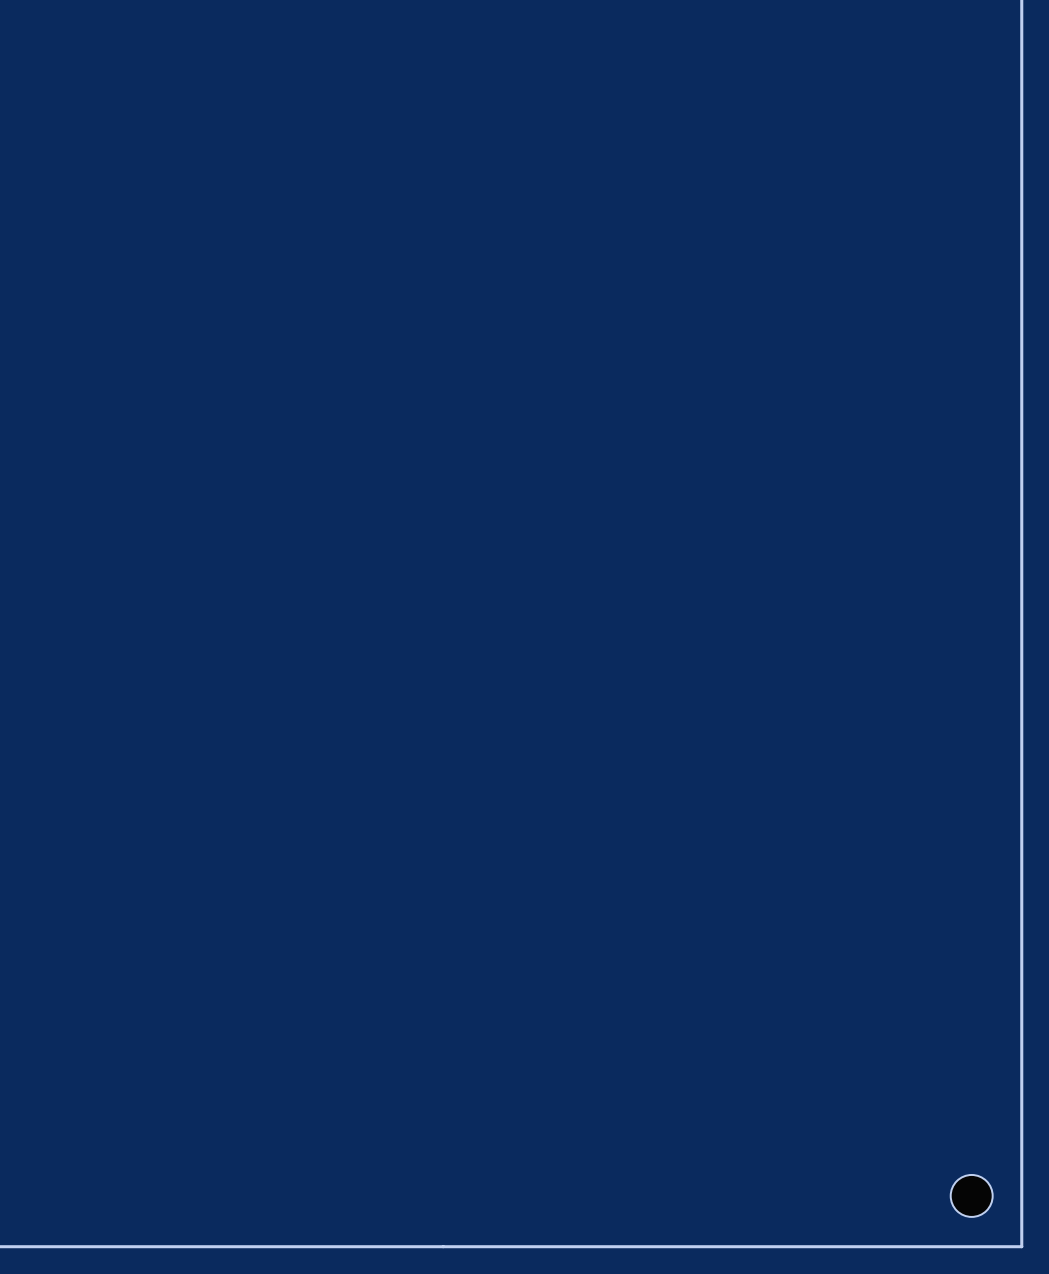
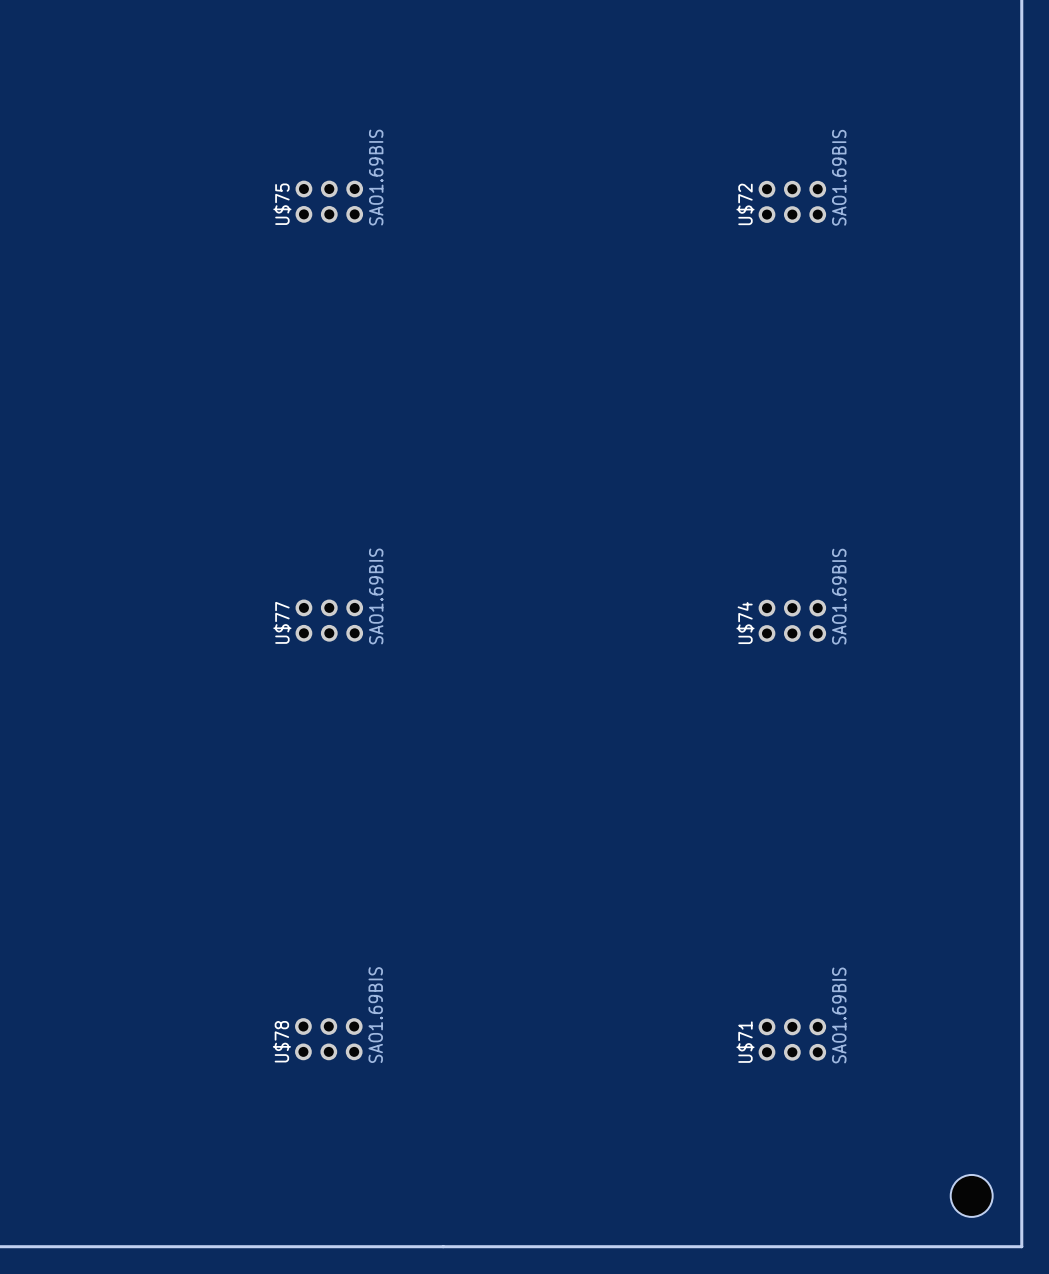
U$75: none -> SAO1.69BIS (329, 201)
U$72: none -> SAO1.69BIS (792, 201)
U$77: none -> SAO1.69BIS (329, 620)
U$74: none -> SAO1.69BIS (792, 620)
U$78: none -> SAO1.69BIS (328, 1039)
U$71: none -> SAO1.69BIS (792, 1039)

